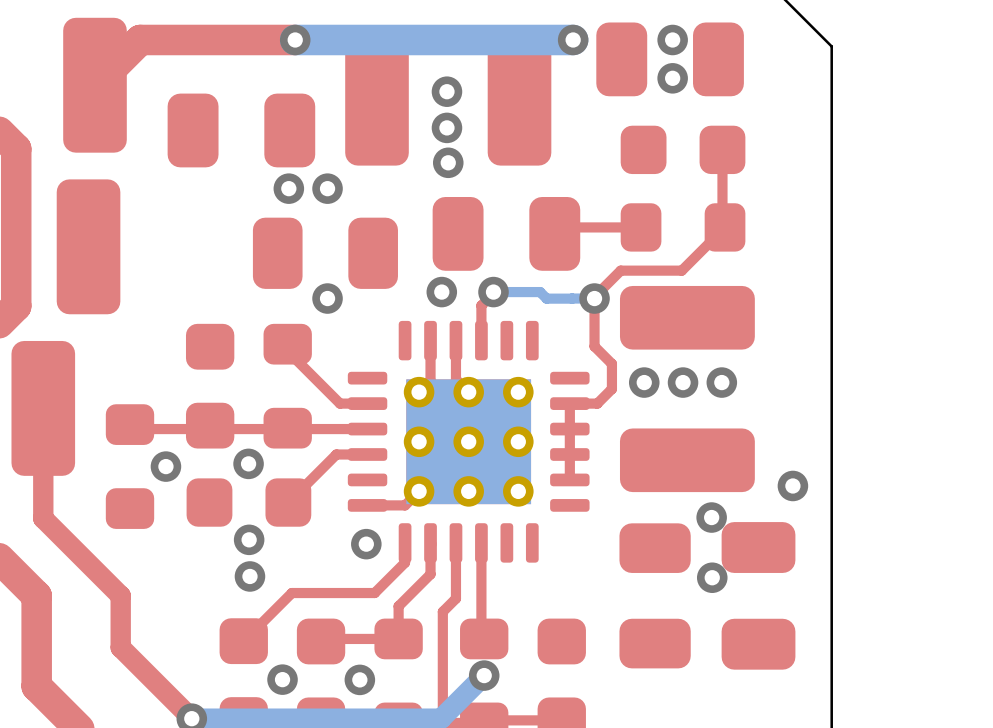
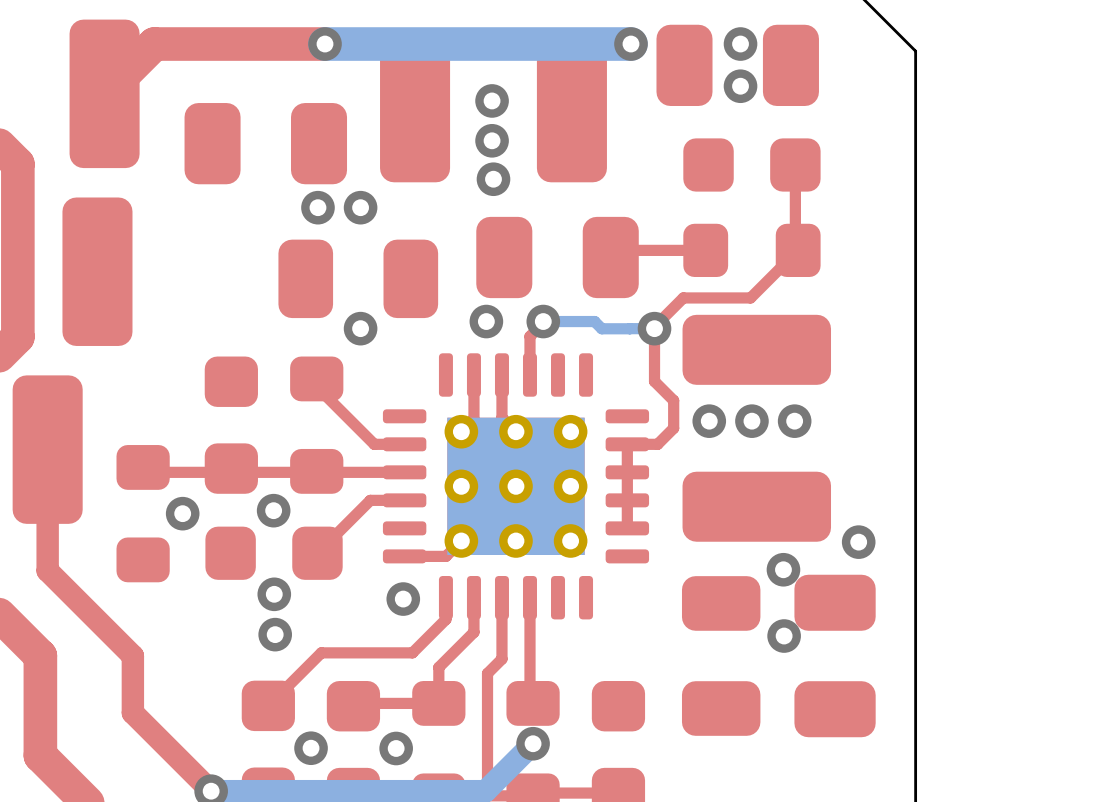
via position: (792, 485) -> (858, 542)

